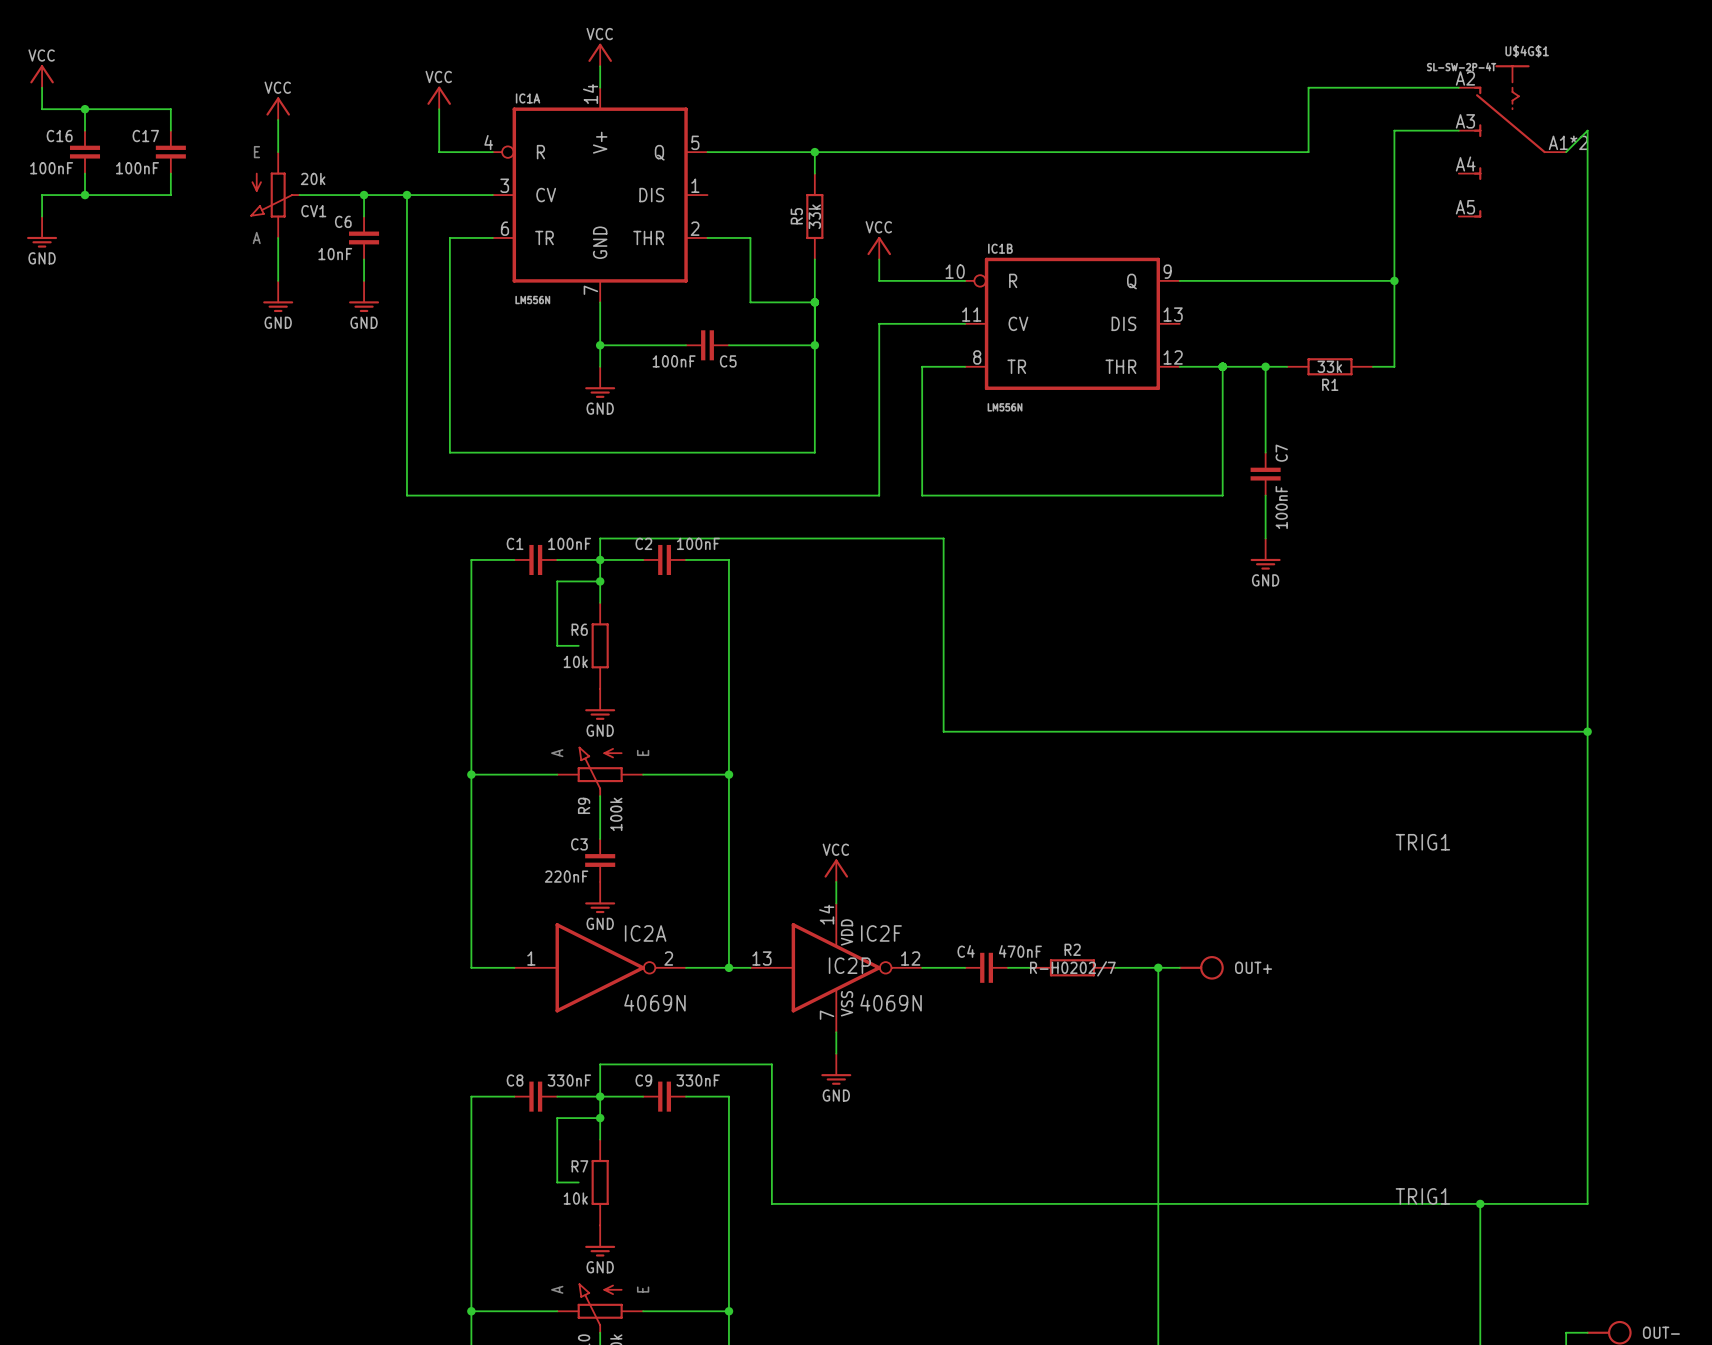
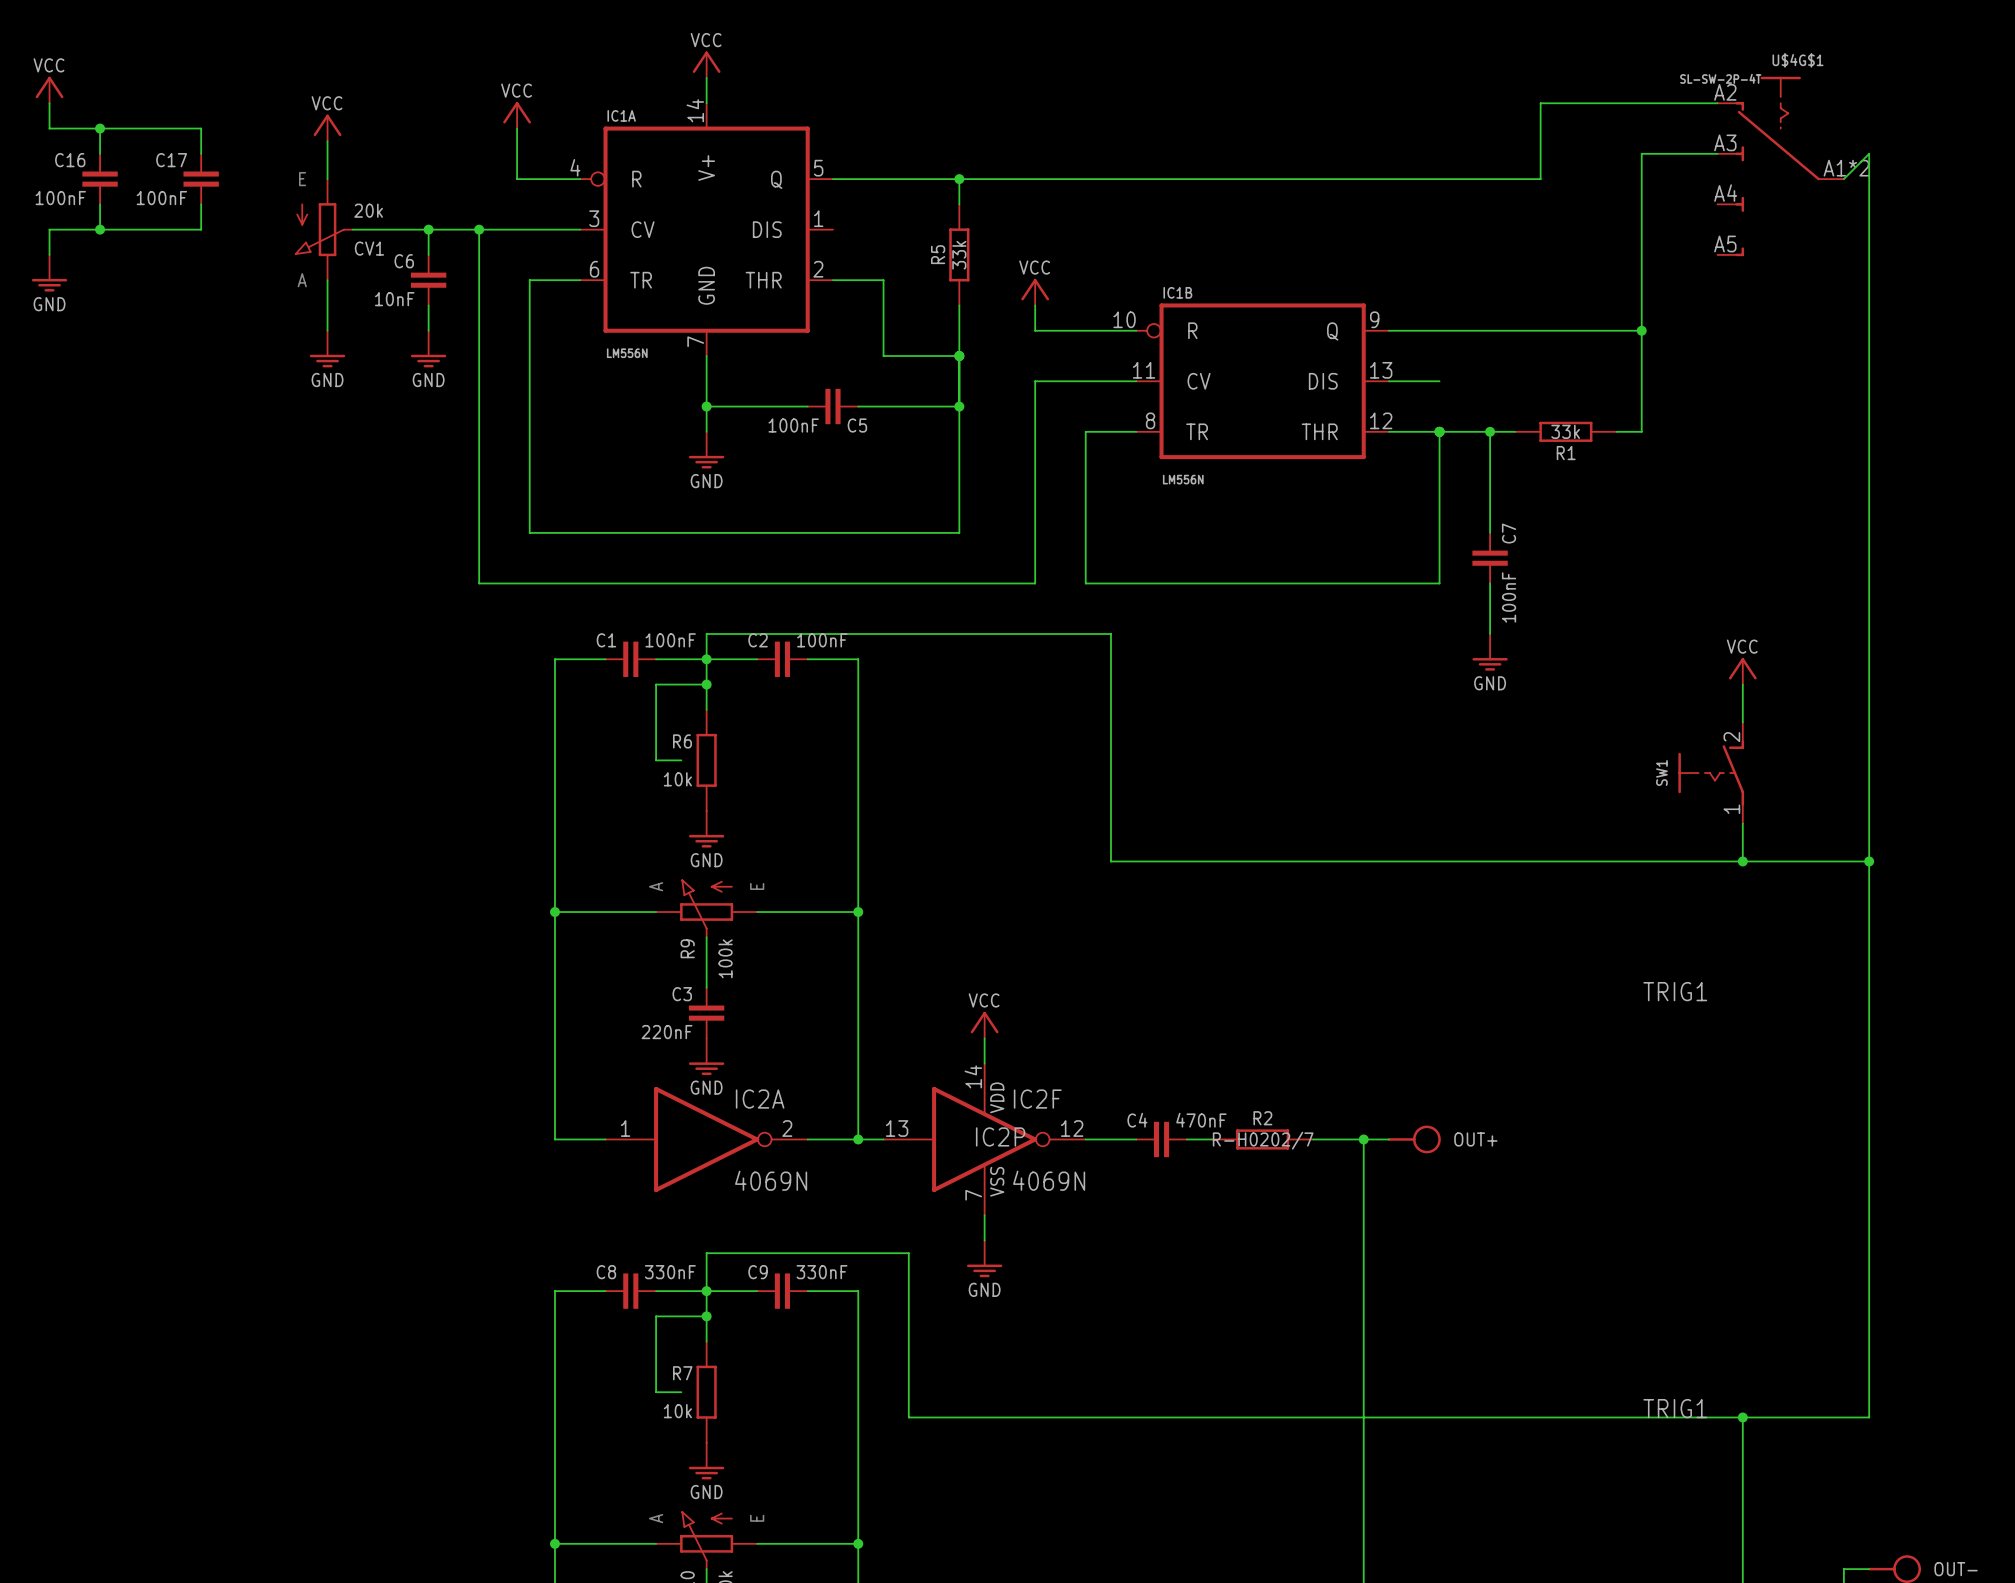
wire: none -> (1388, 381) (1439, 381)
power symbol: none -> VCC (1742, 671)
wire: none -> (1742, 684) (1742, 722)
SW1: none -> (1711, 773)
wire: none -> (1742, 823) (1742, 861)
junction: none -> (1742, 861)

